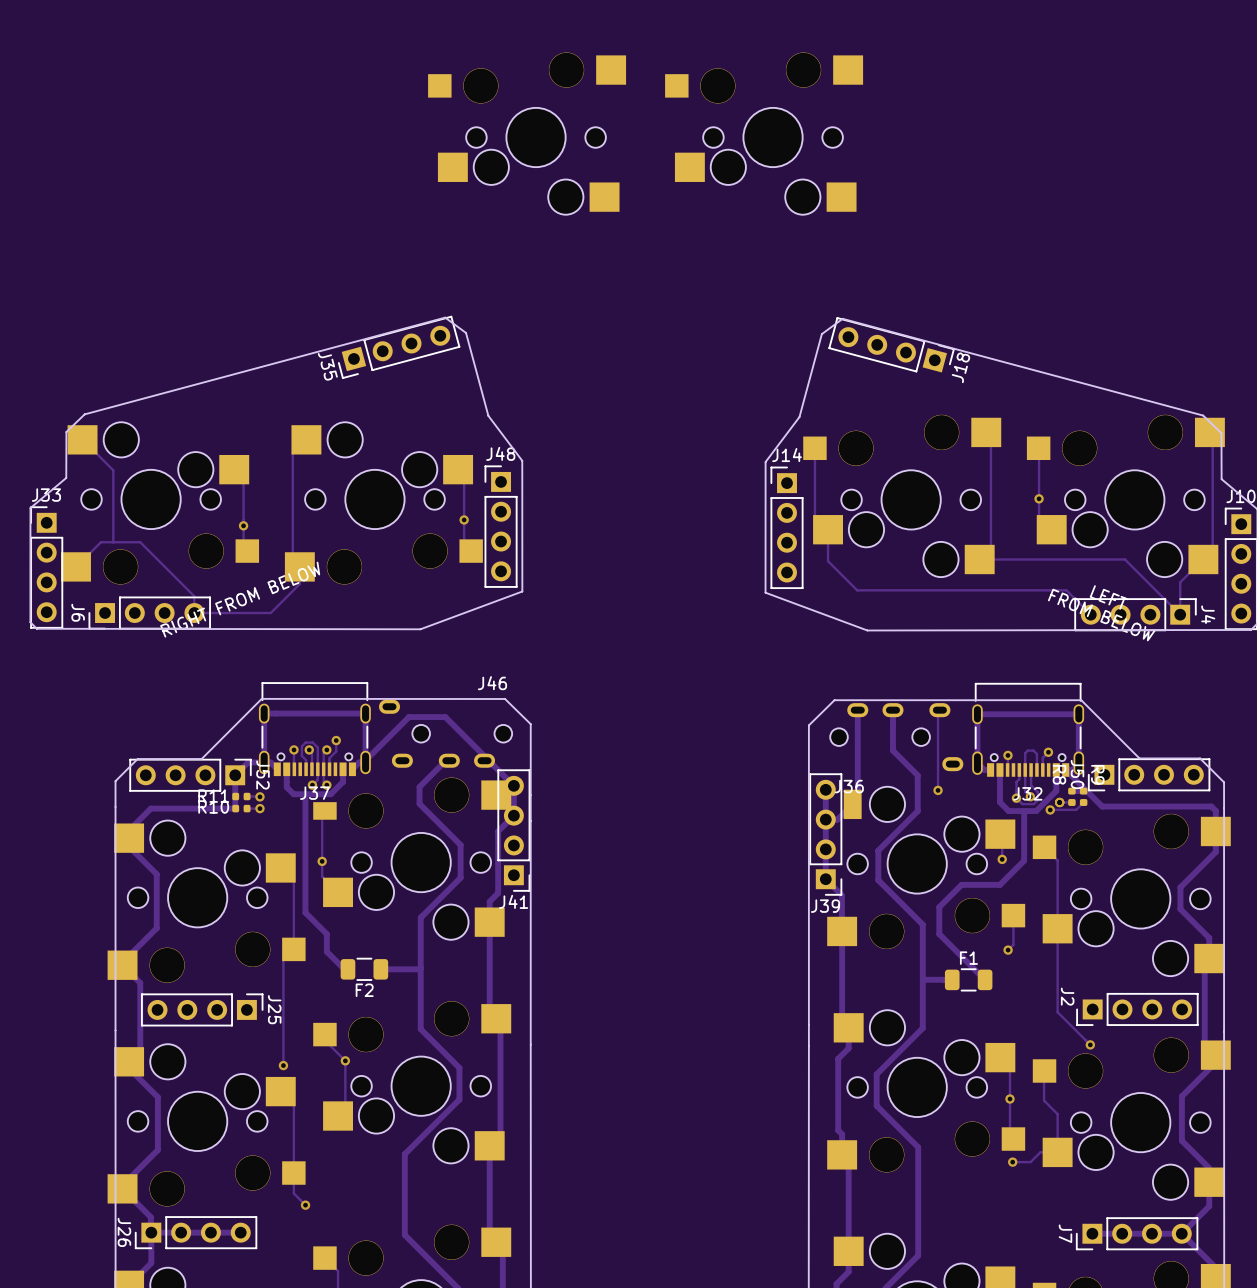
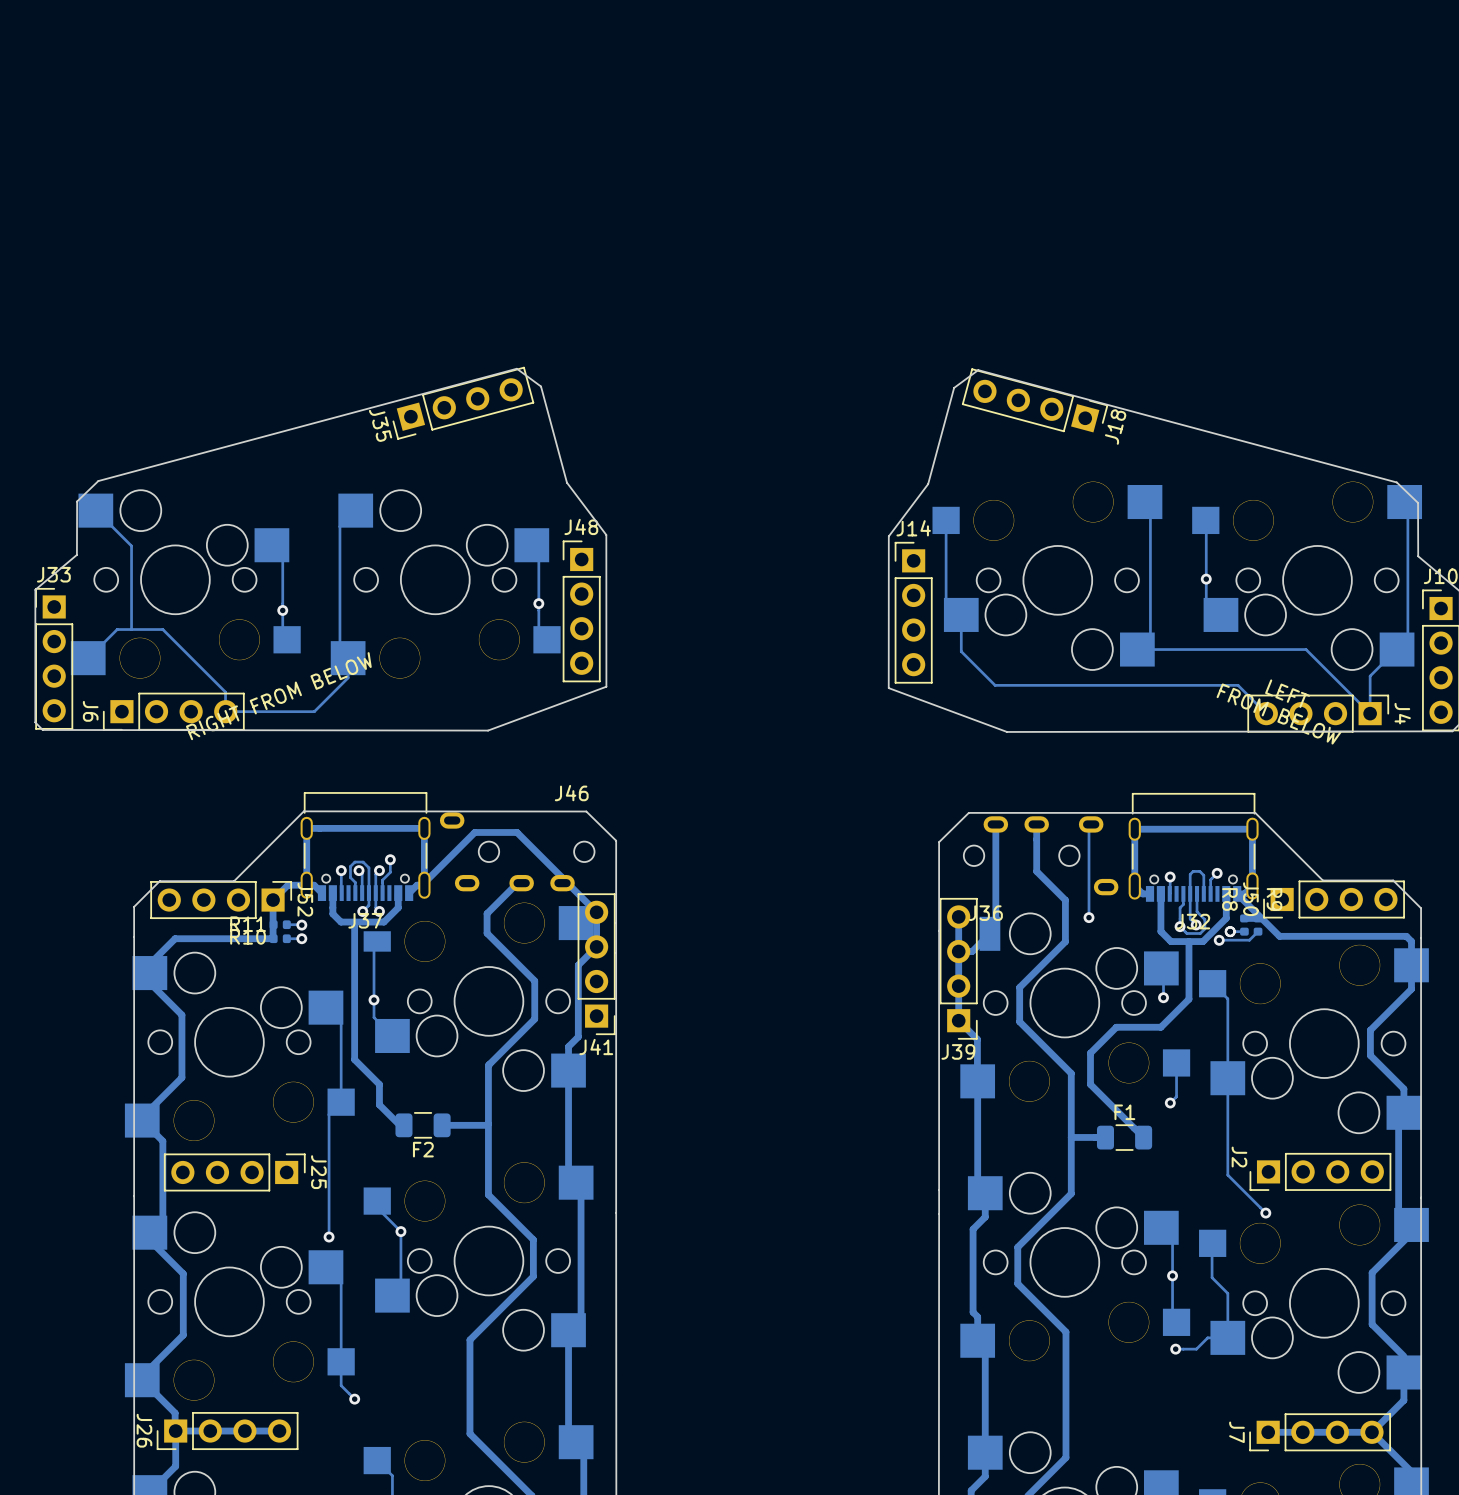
part: (527, 133) -> none
part: (764, 133) -> none

